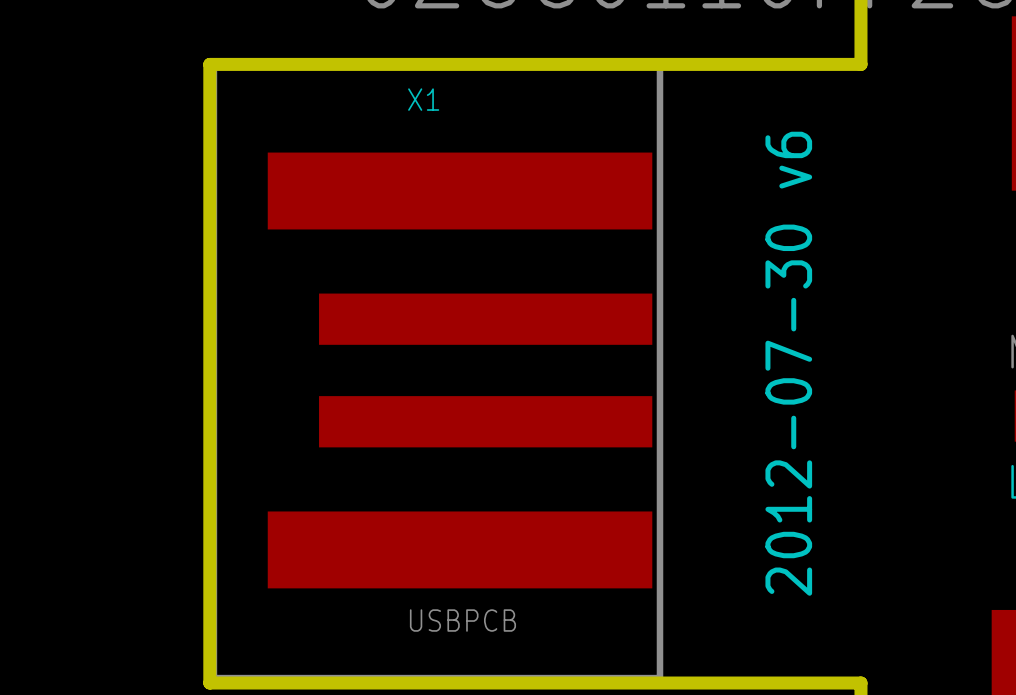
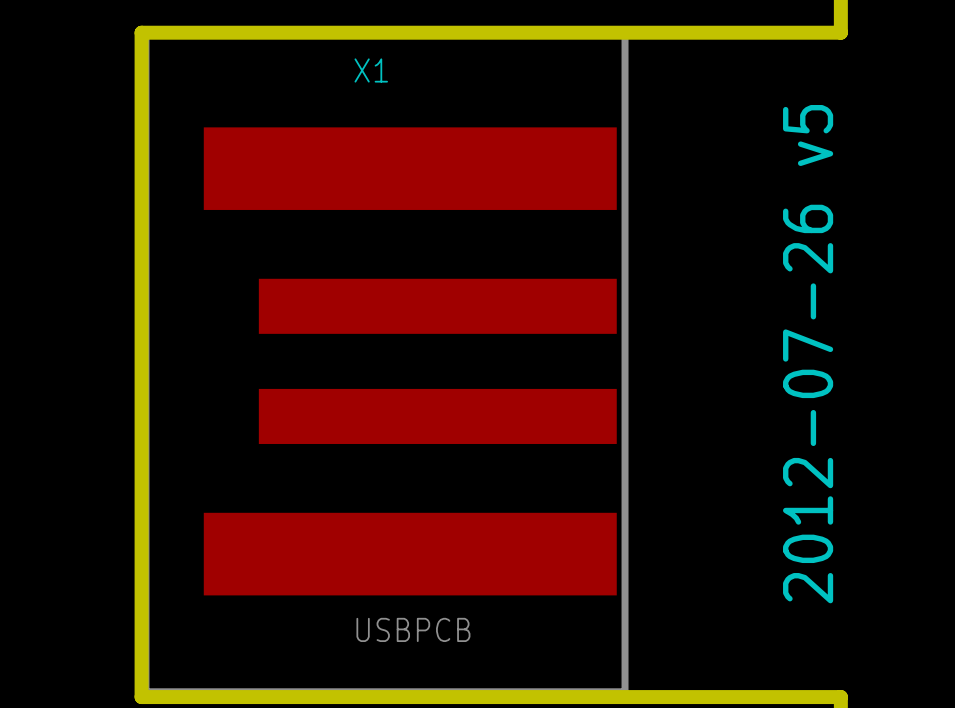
text: 2012-07-30 v6 (788, 363) -> 2012-07-26 v5 (808, 354)

